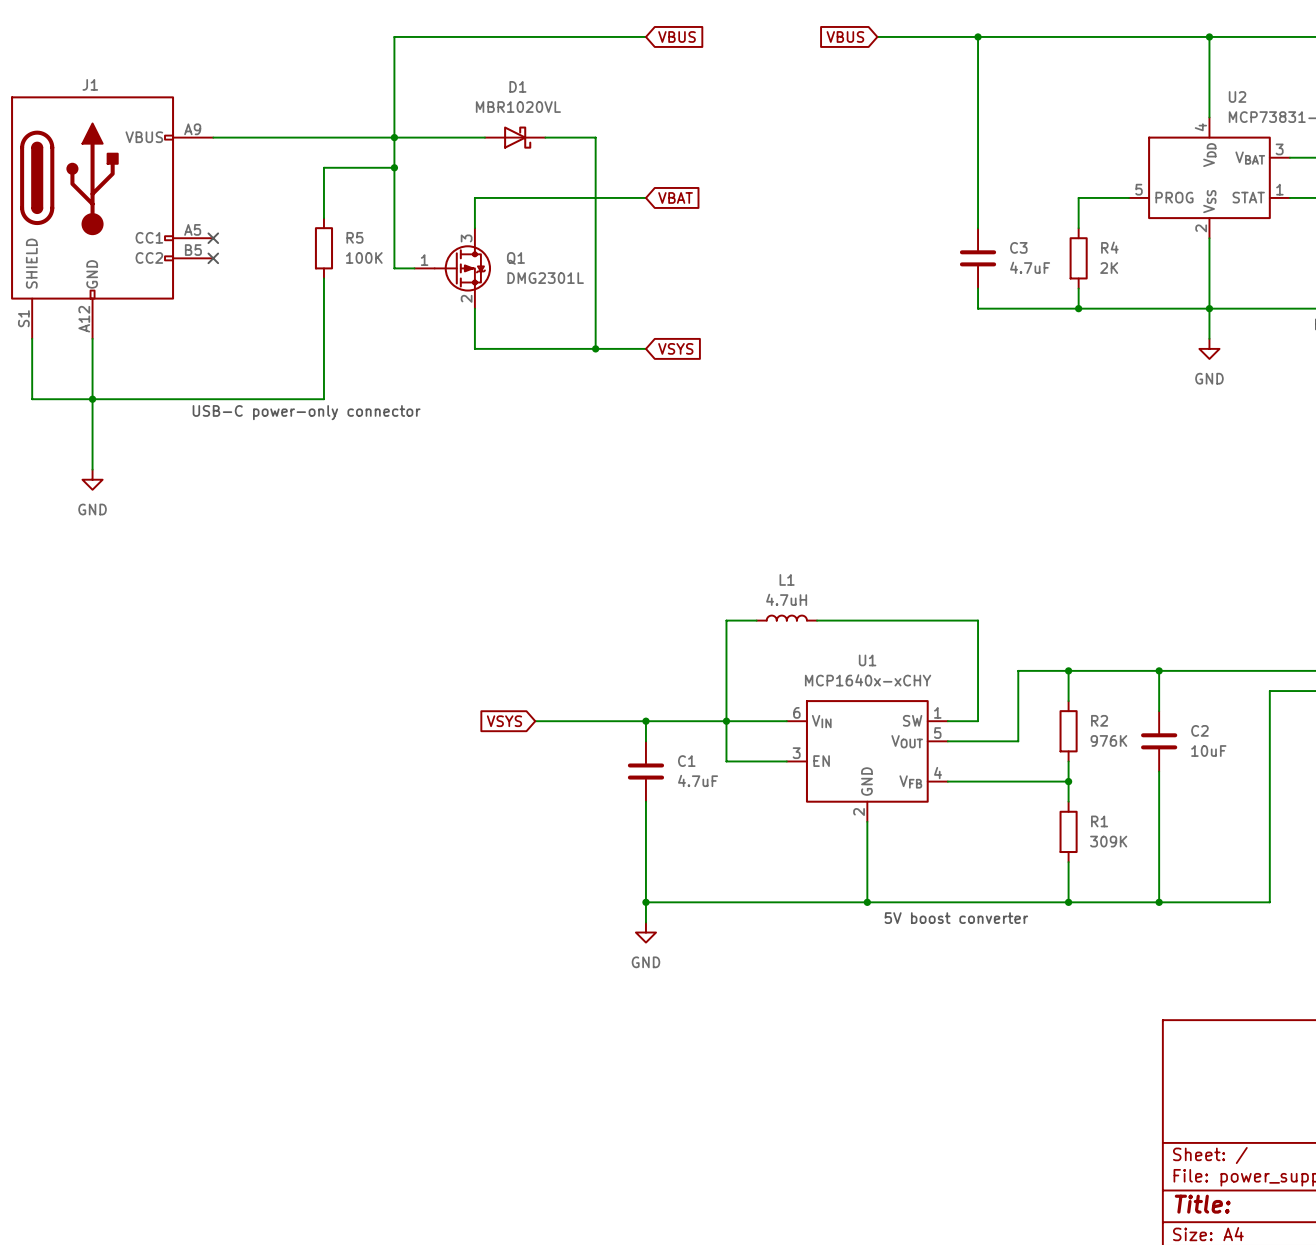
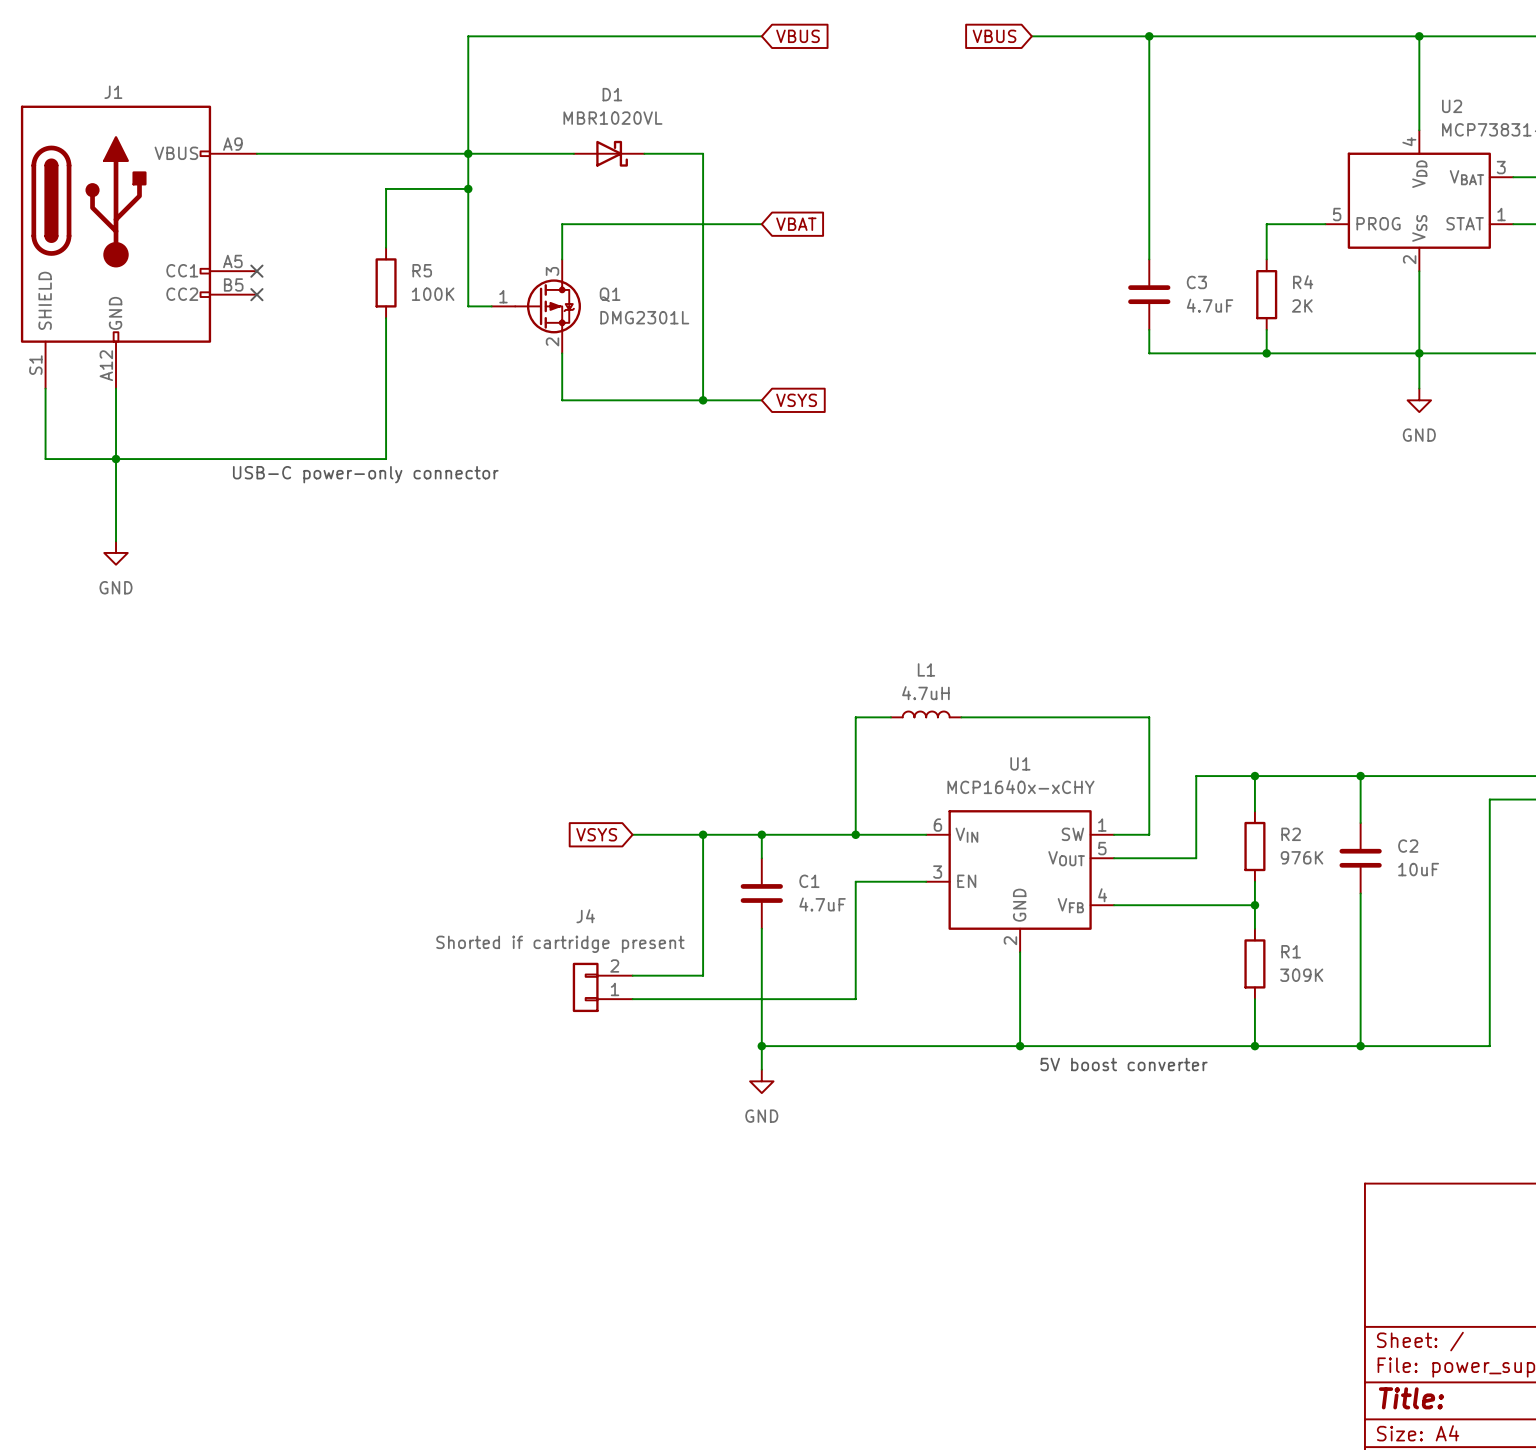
wire: none -> (703, 834) (703, 975) (632, 975)
junction: none -> (703, 834)
wire: (726, 721) (726, 761) -> (632, 999) (855, 999) (855, 881)
J4: none -> Shorted if cartridge present (602, 987)

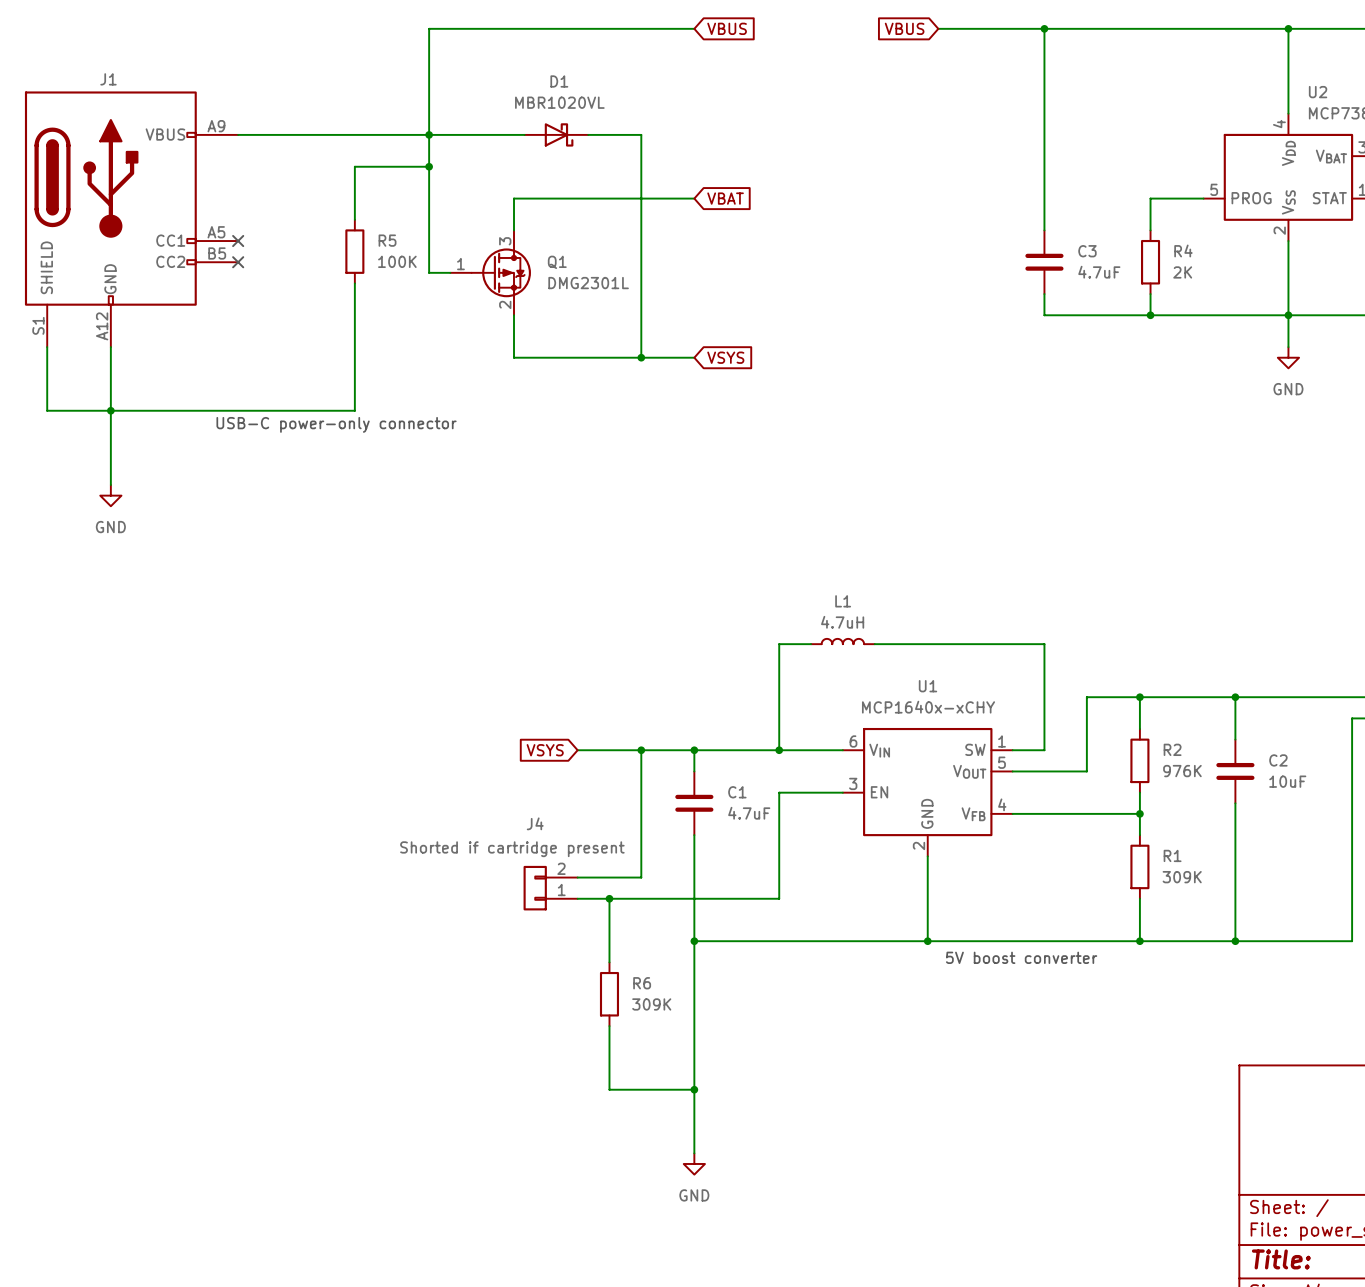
wire: none -> (609, 898) (609, 962)
junction: none -> (609, 898)
wire: none -> (694, 962) (694, 1153)
power symbol position: GND (761, 1081) -> GND (694, 1163)
R6: none -> 309K (609, 994)
wire: none -> (609, 1026) (609, 1089) (694, 1089)
junction: none -> (694, 1089)

